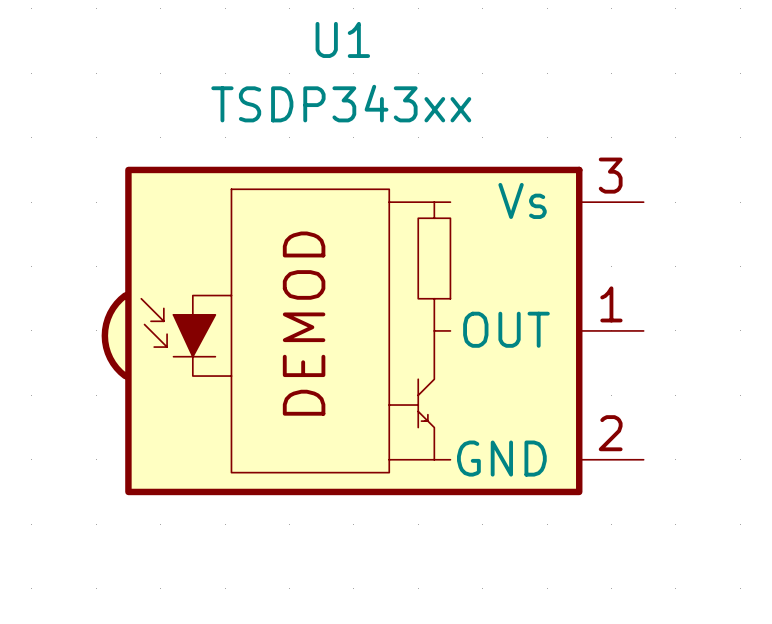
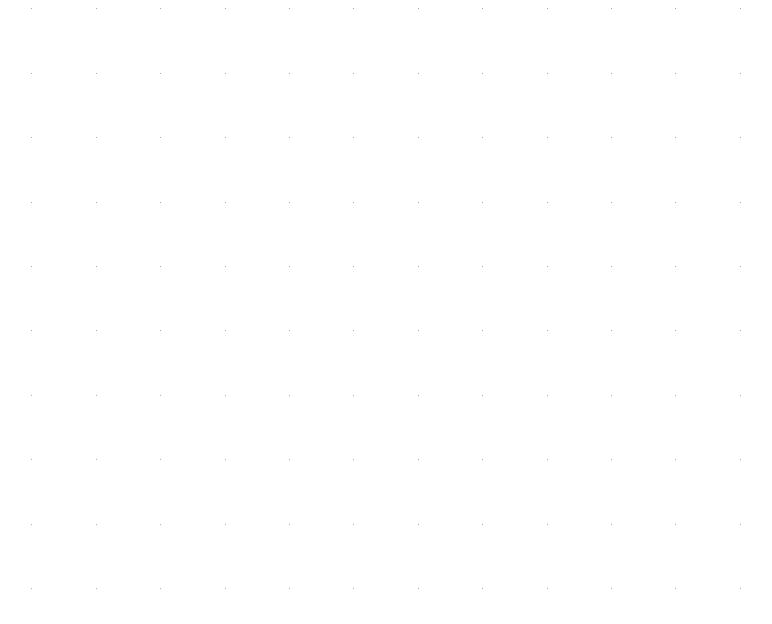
U1: TSDP343xx (372, 330) -> none

